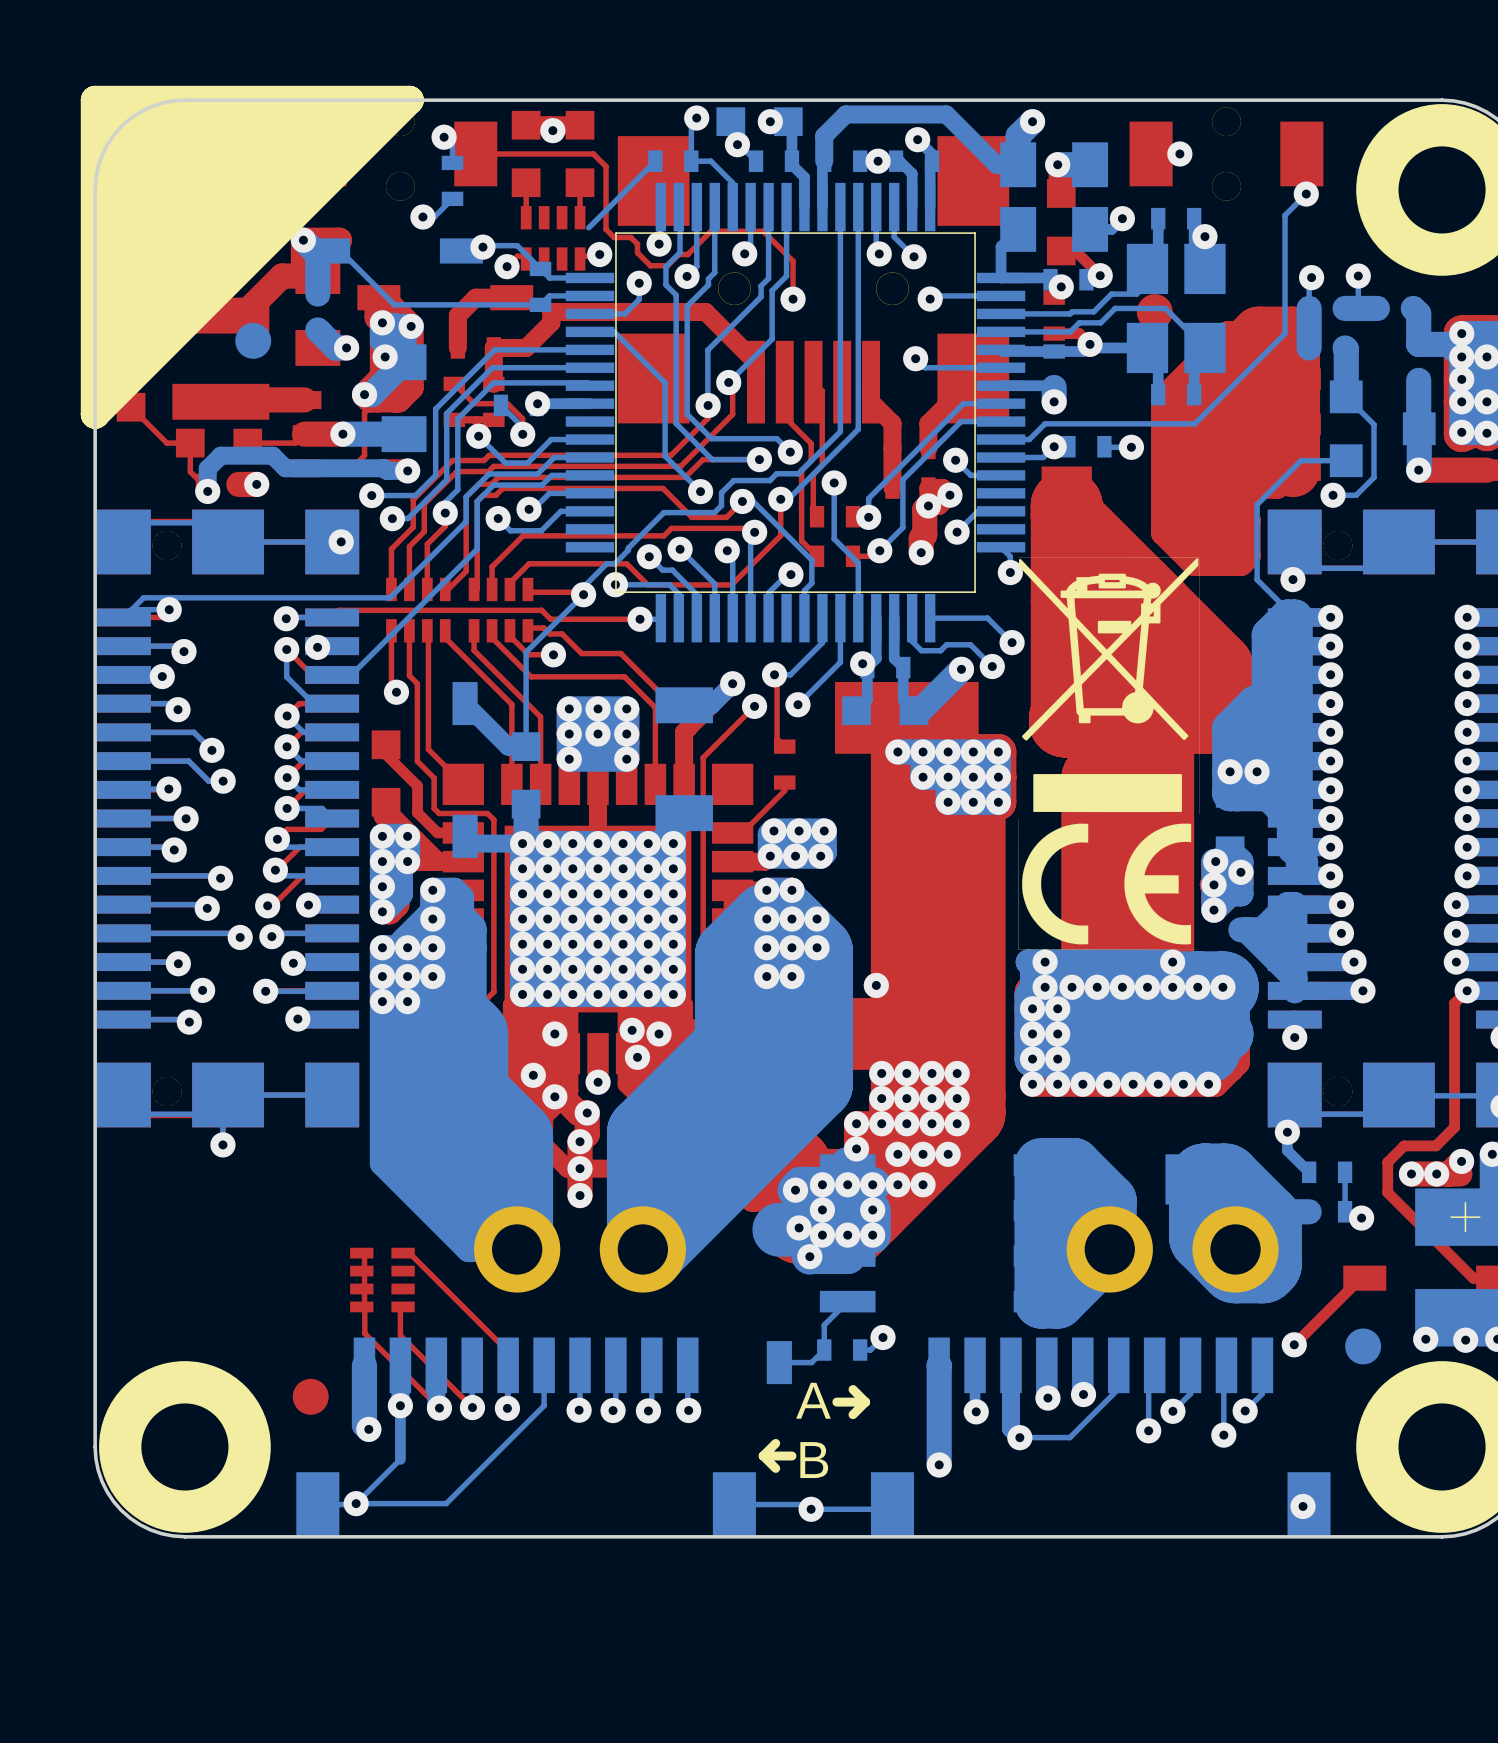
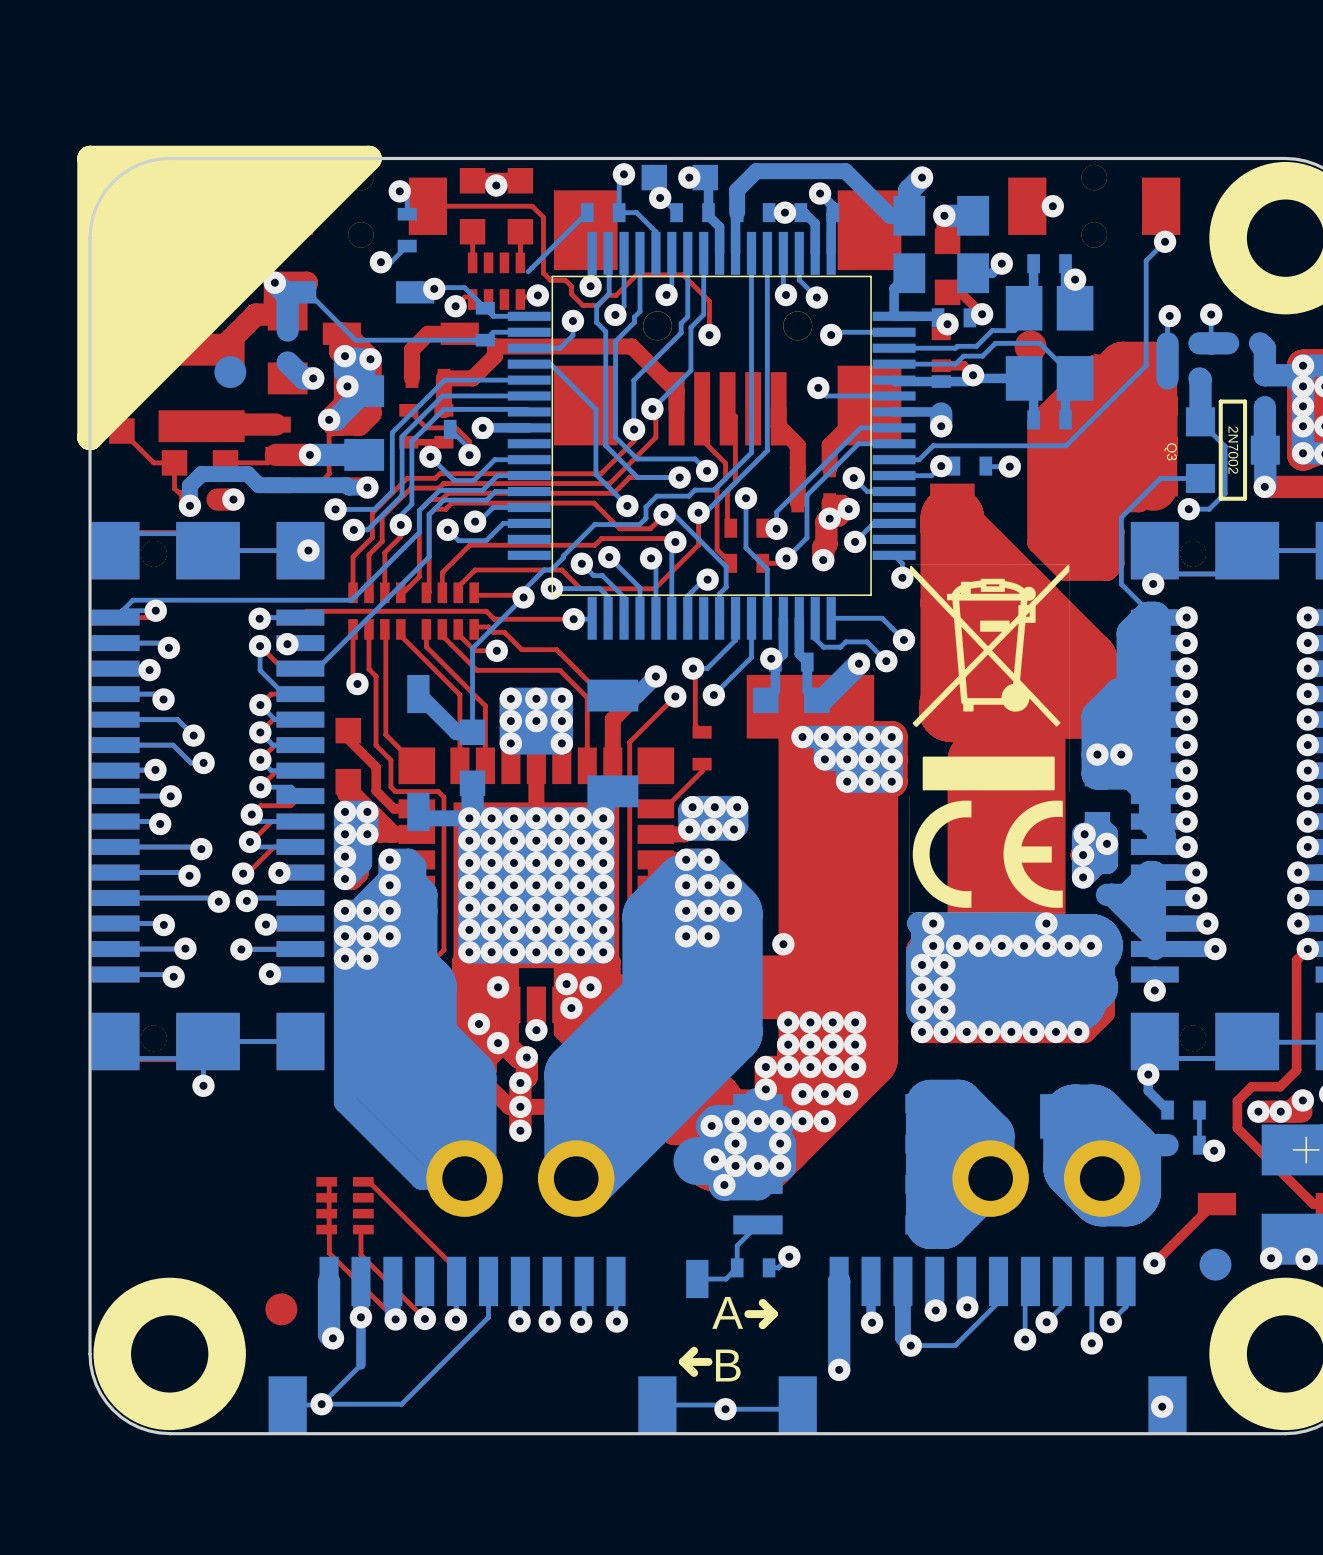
Q3: none -> 2N7002 (1232, 450)

